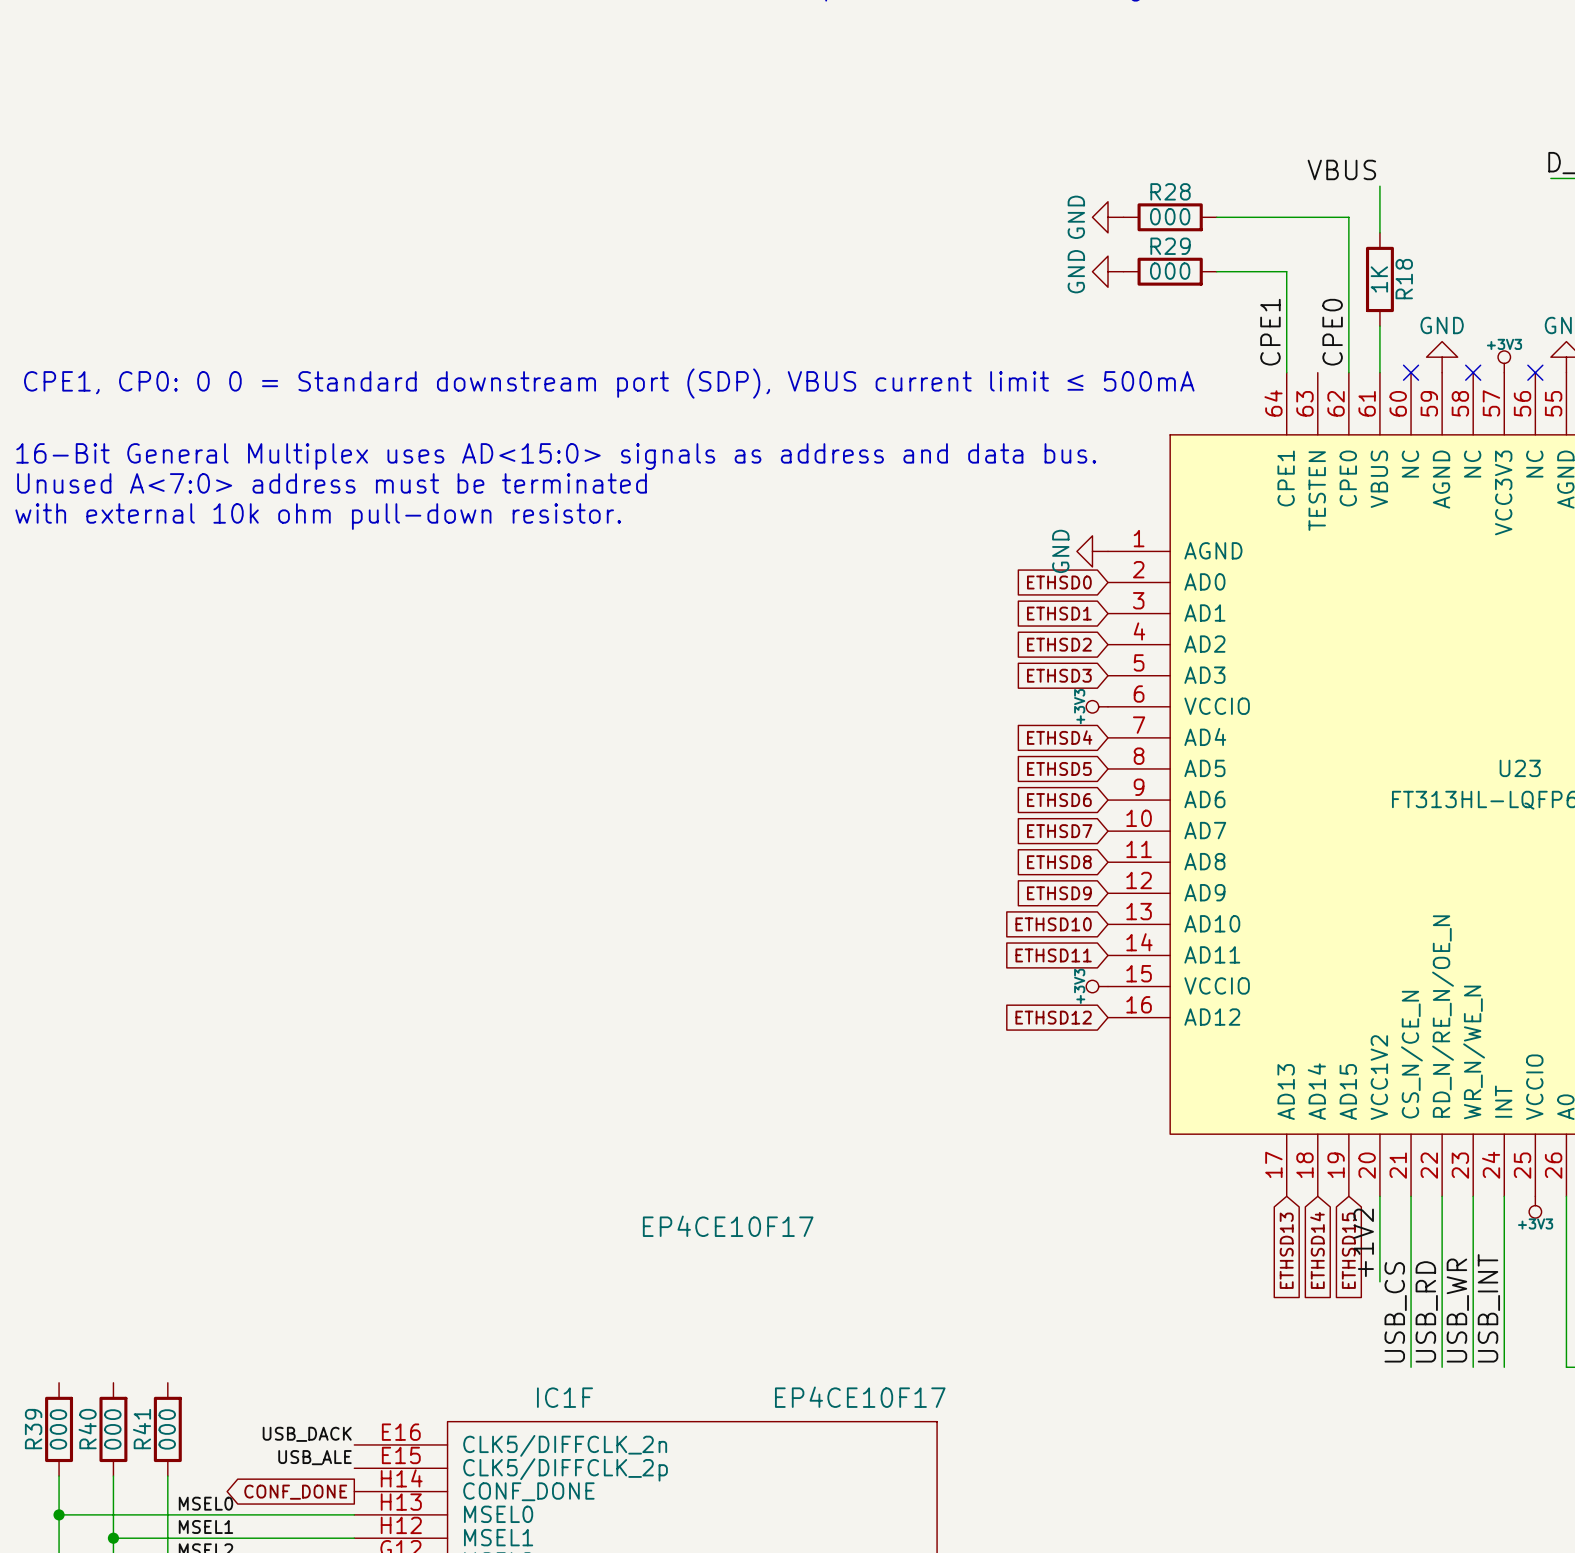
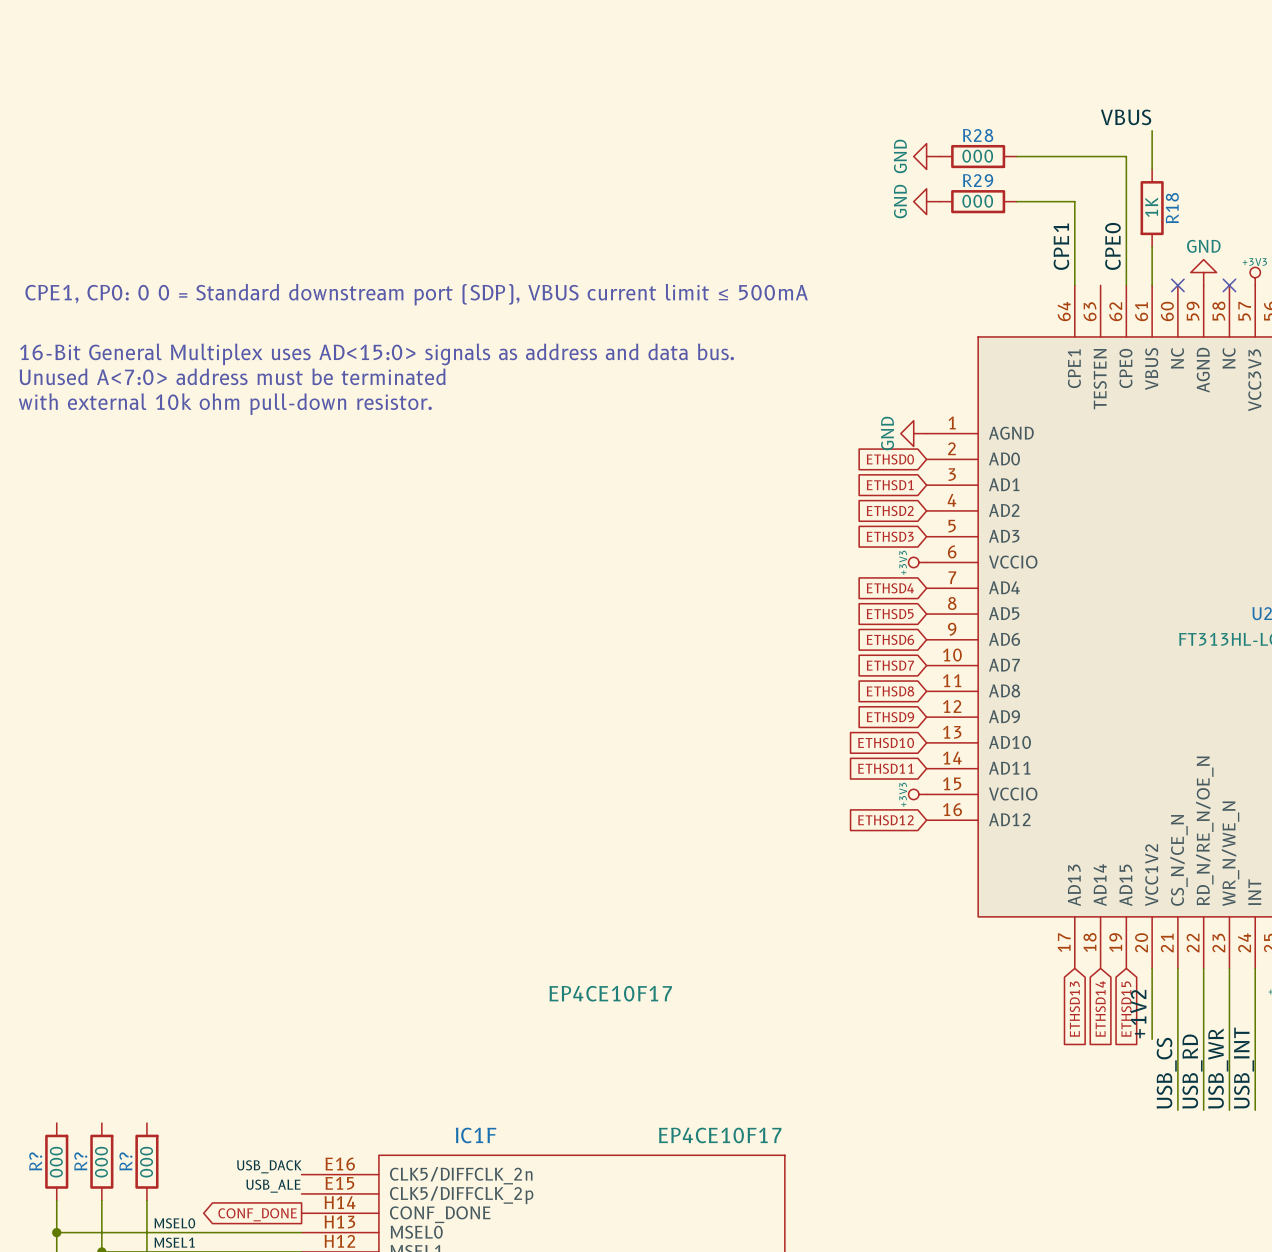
R39 name: R39 (33, 1429) -> R? (35, 1161)
R40 name: R40 (87, 1429) -> R? (80, 1161)
R41 name: R41 (142, 1429) -> R? (125, 1161)

